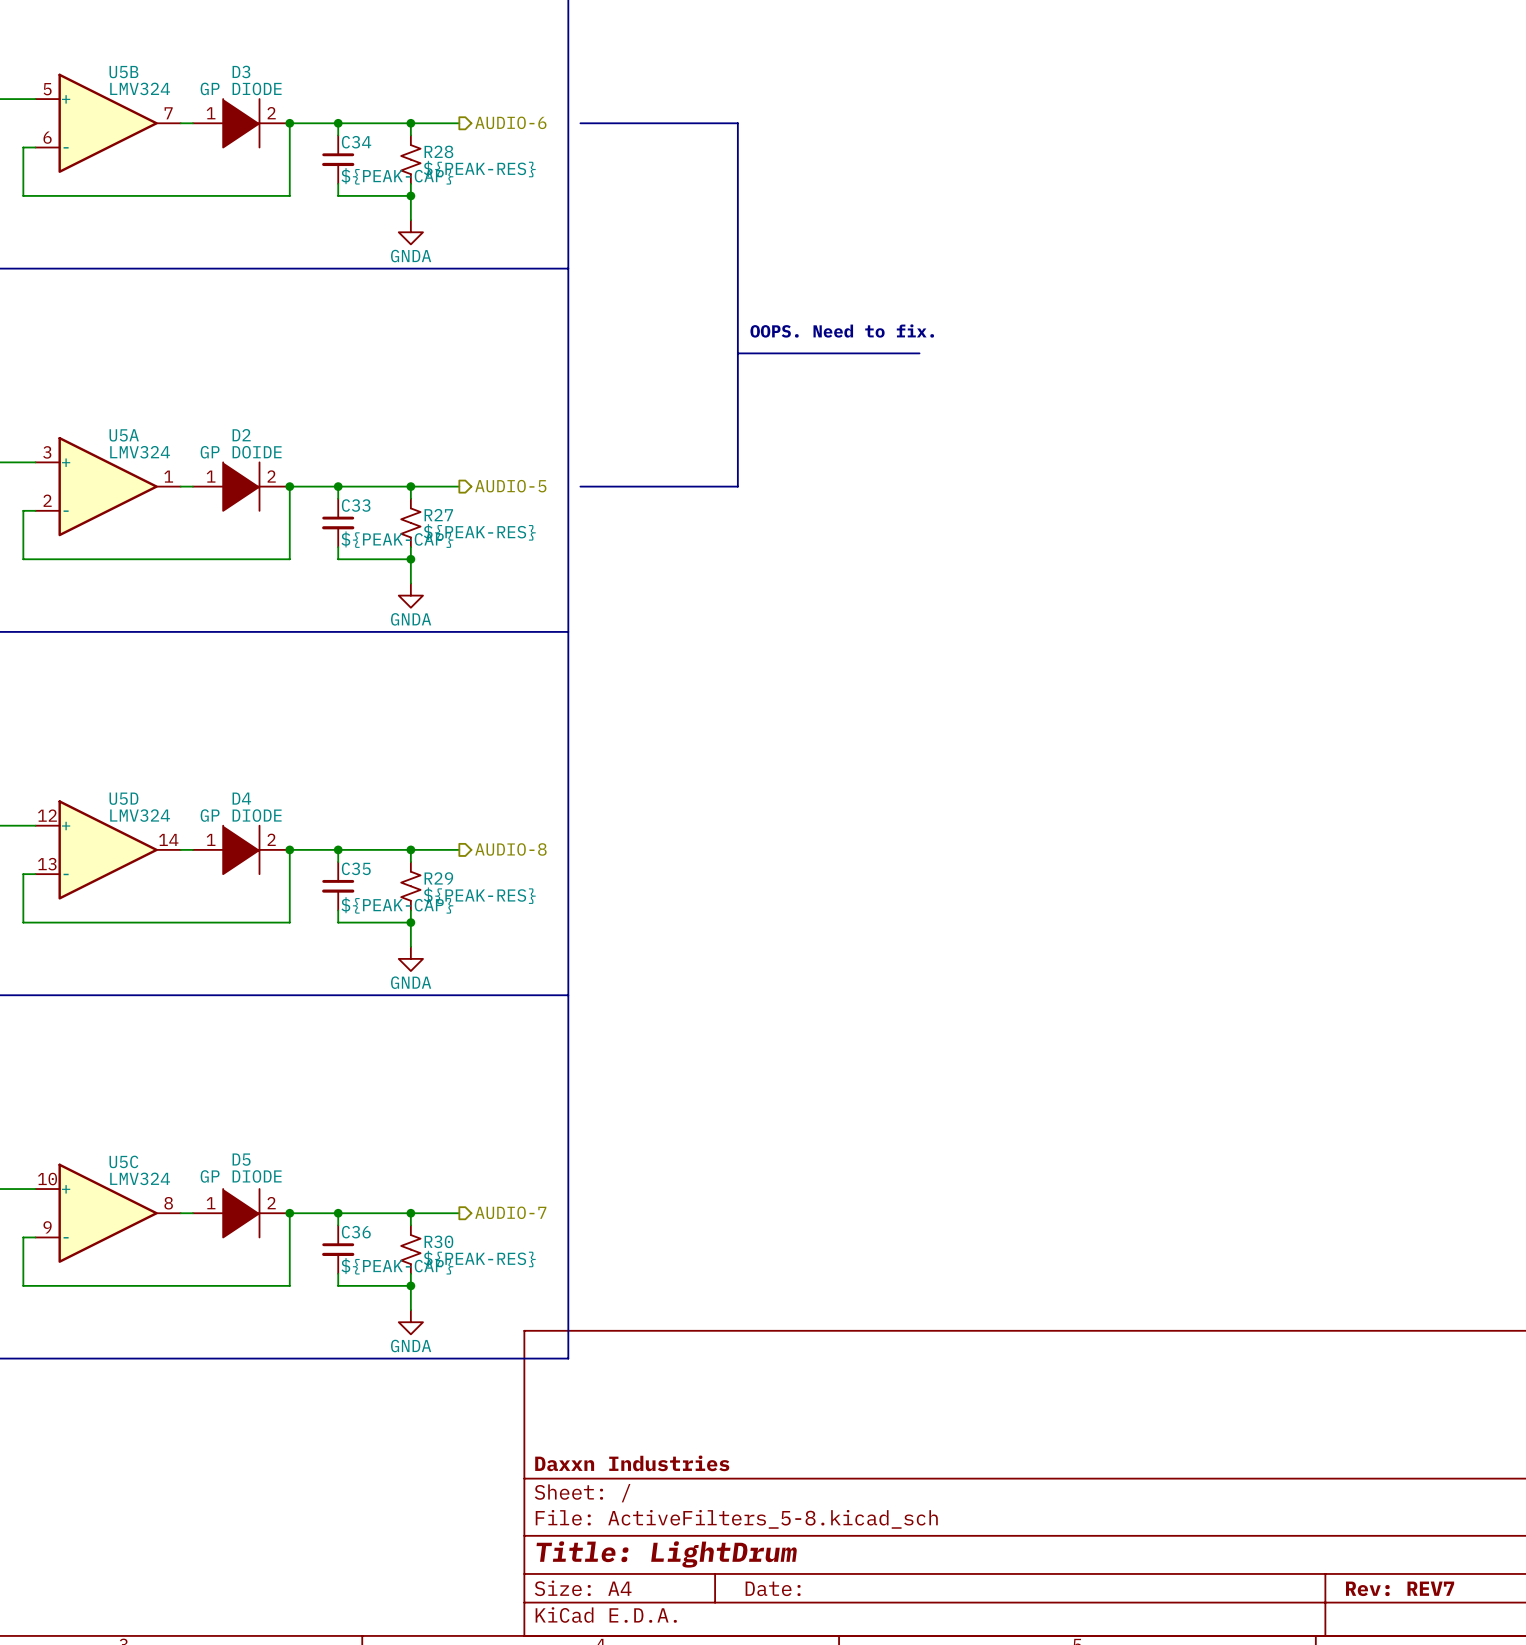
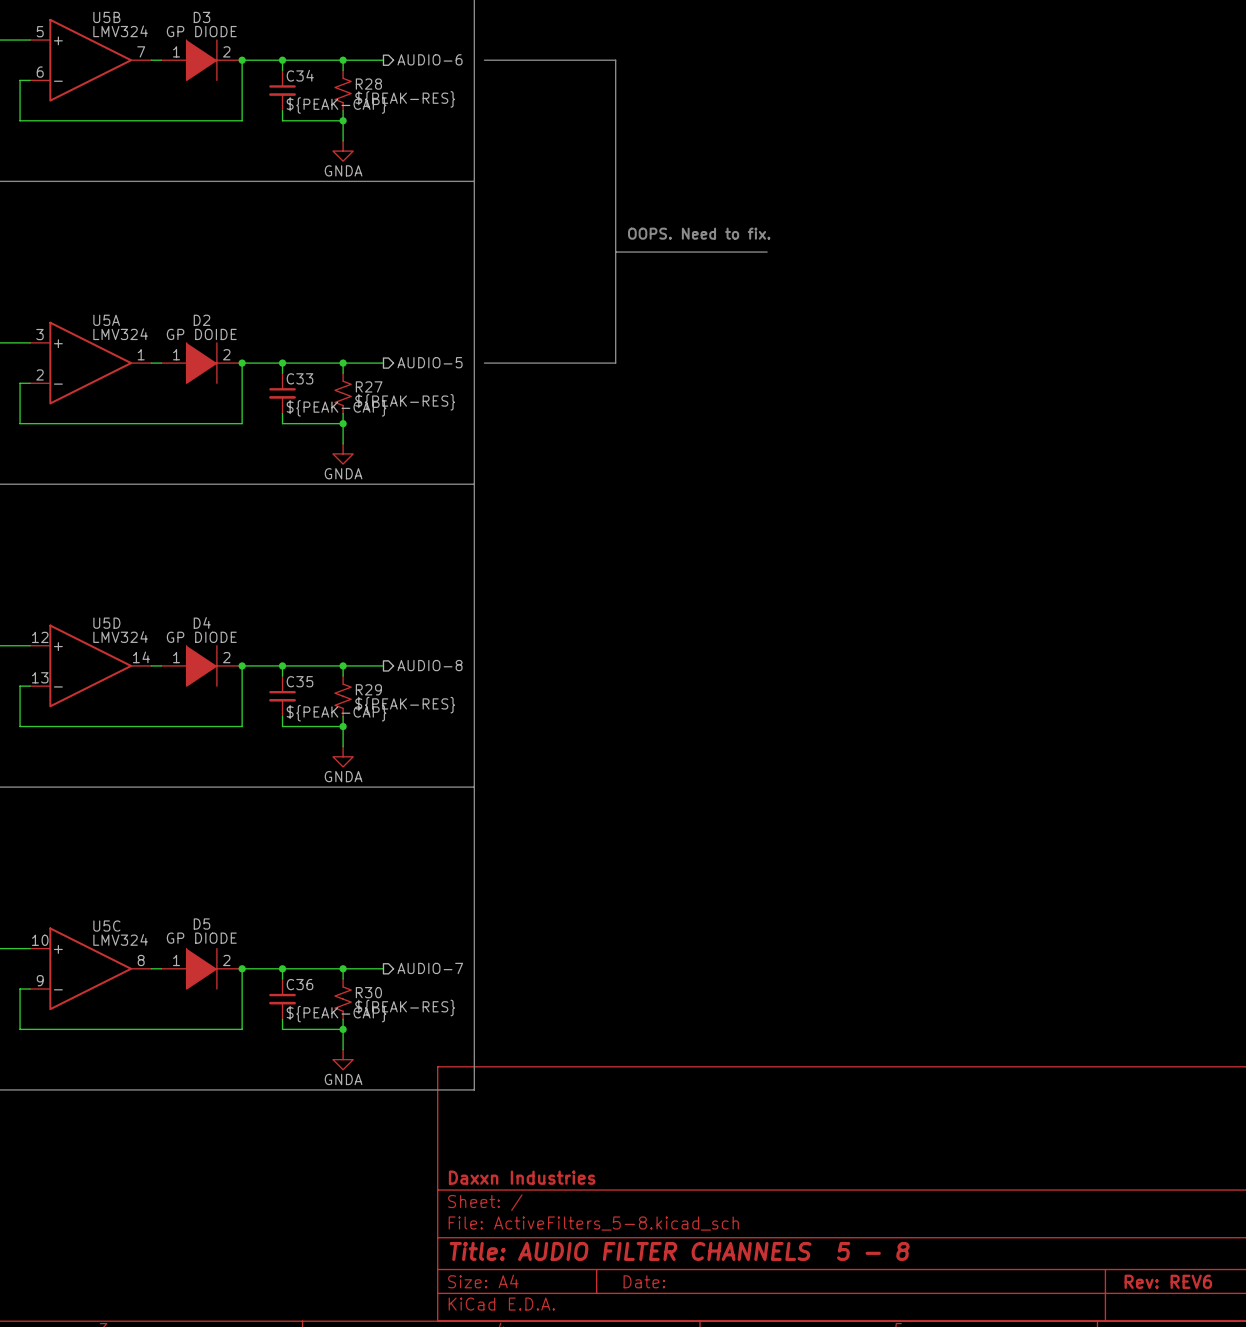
title block: Title: LightDrum (666, 1554) -> Title: AUDIO FILTER CHANNELS 5 - 8 (679, 1251)
title block: Rev: REV7 (1400, 1588) -> Rev: REV6 (1168, 1281)

